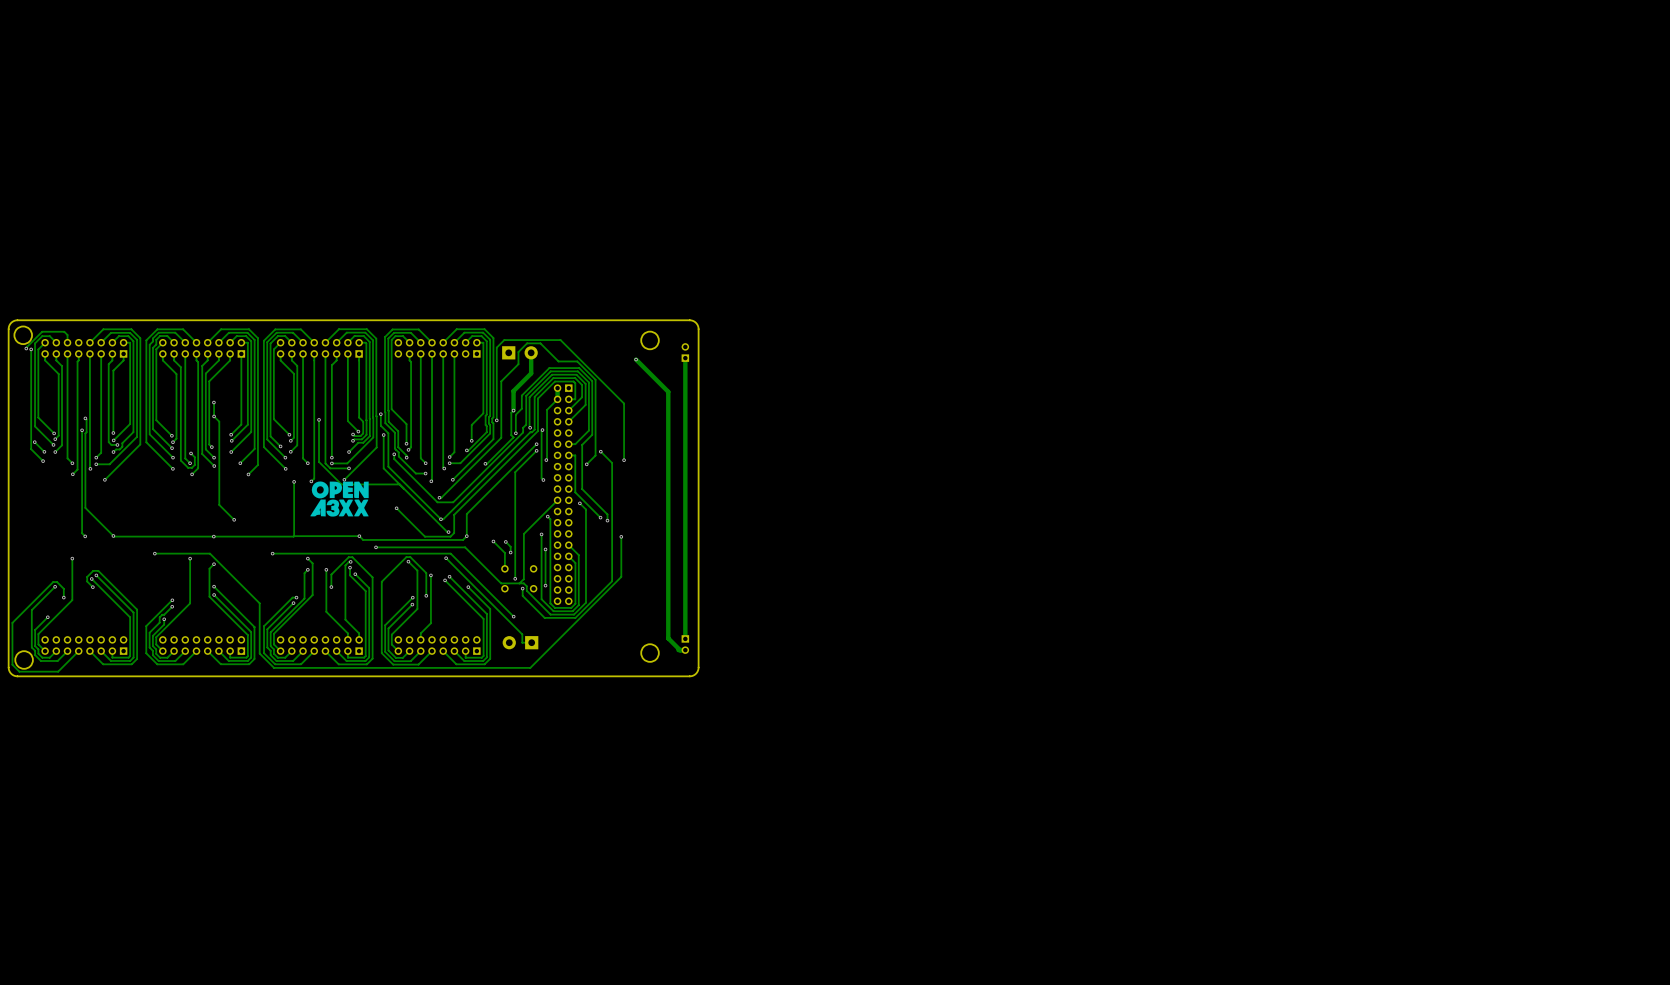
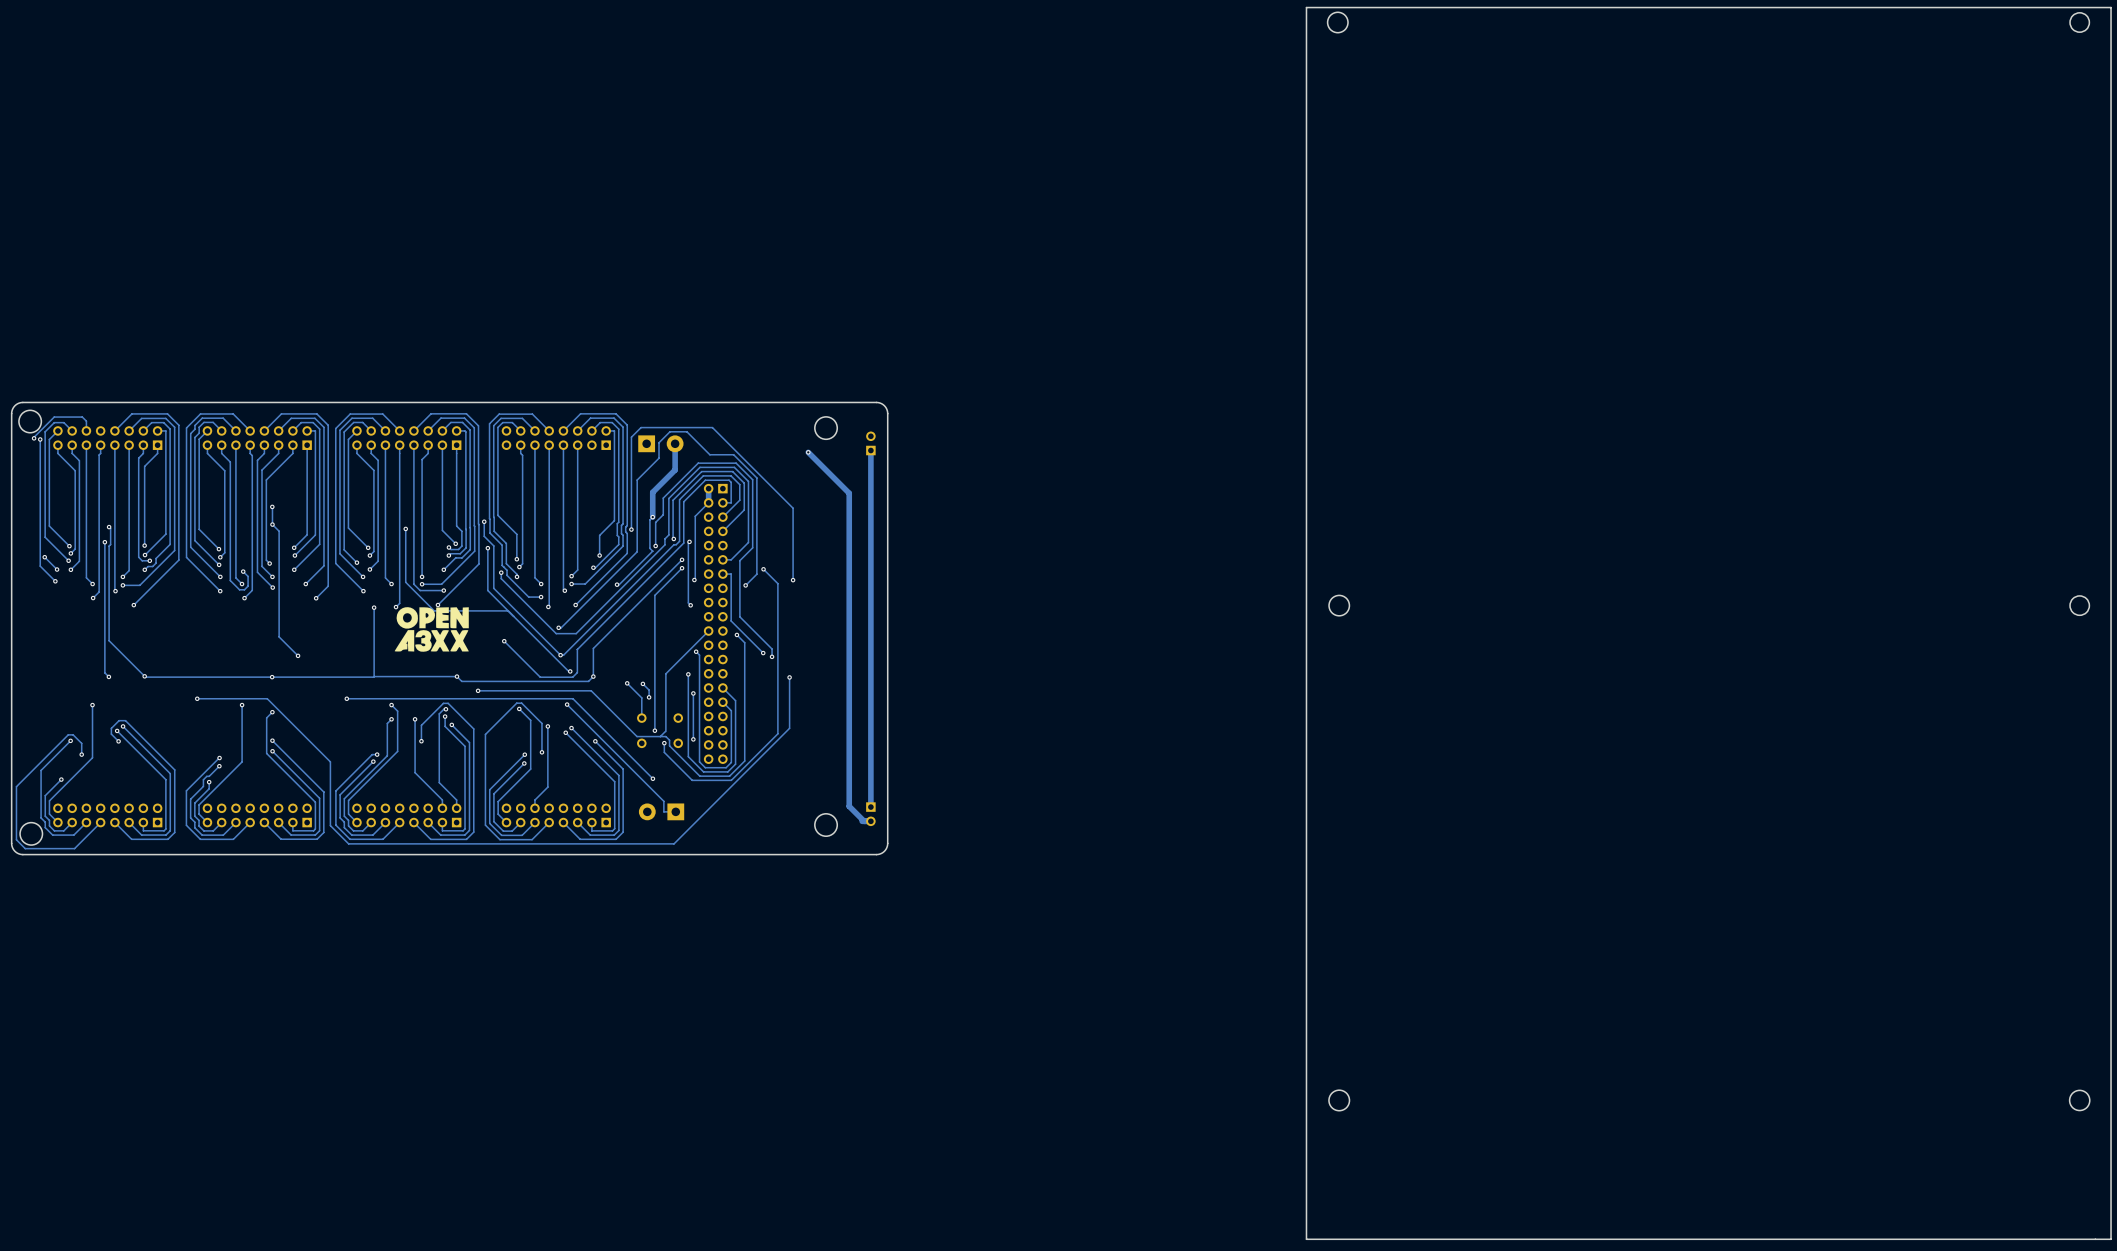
board edge: none -> (2111, 7) (2111, 1239) (1306, 1239) (1306, 7) (2111, 7)
round board edge: none -> [1327, 12, 1349, 33]
round board edge: none -> [2069, 12, 2090, 33]
round board edge: none -> [1328, 595, 1350, 616]
round board edge: none -> [2069, 595, 2090, 616]
round board edge: none -> [1328, 1090, 1350, 1111]
round board edge: none -> [2069, 1090, 2090, 1111]

